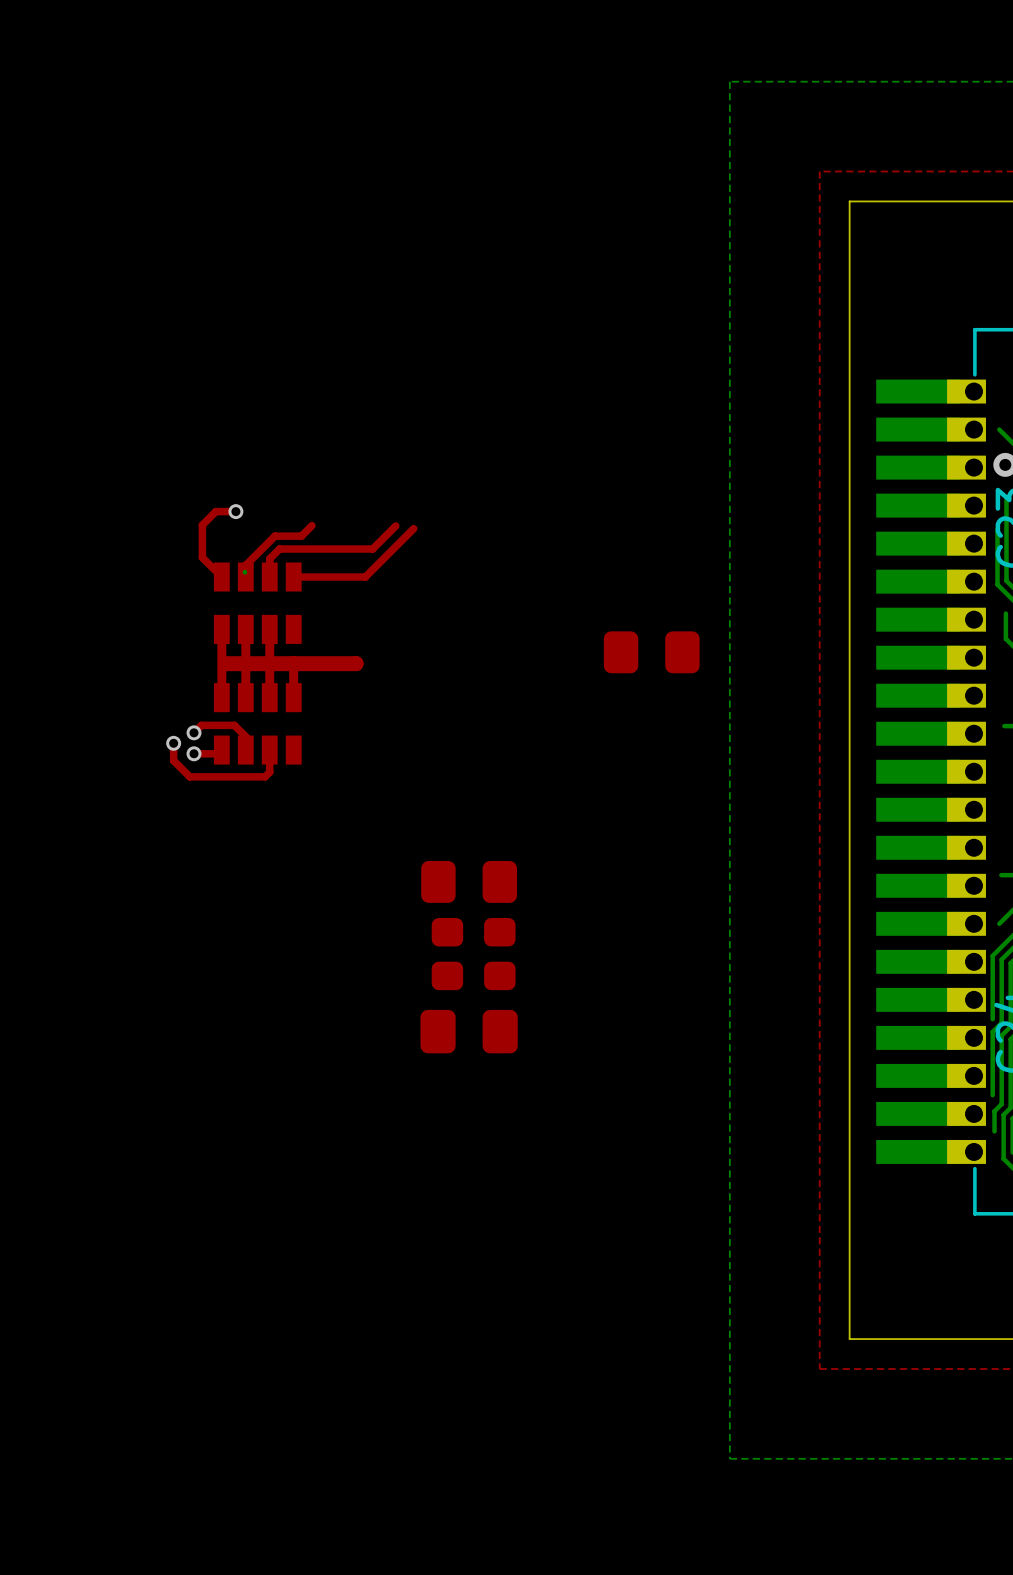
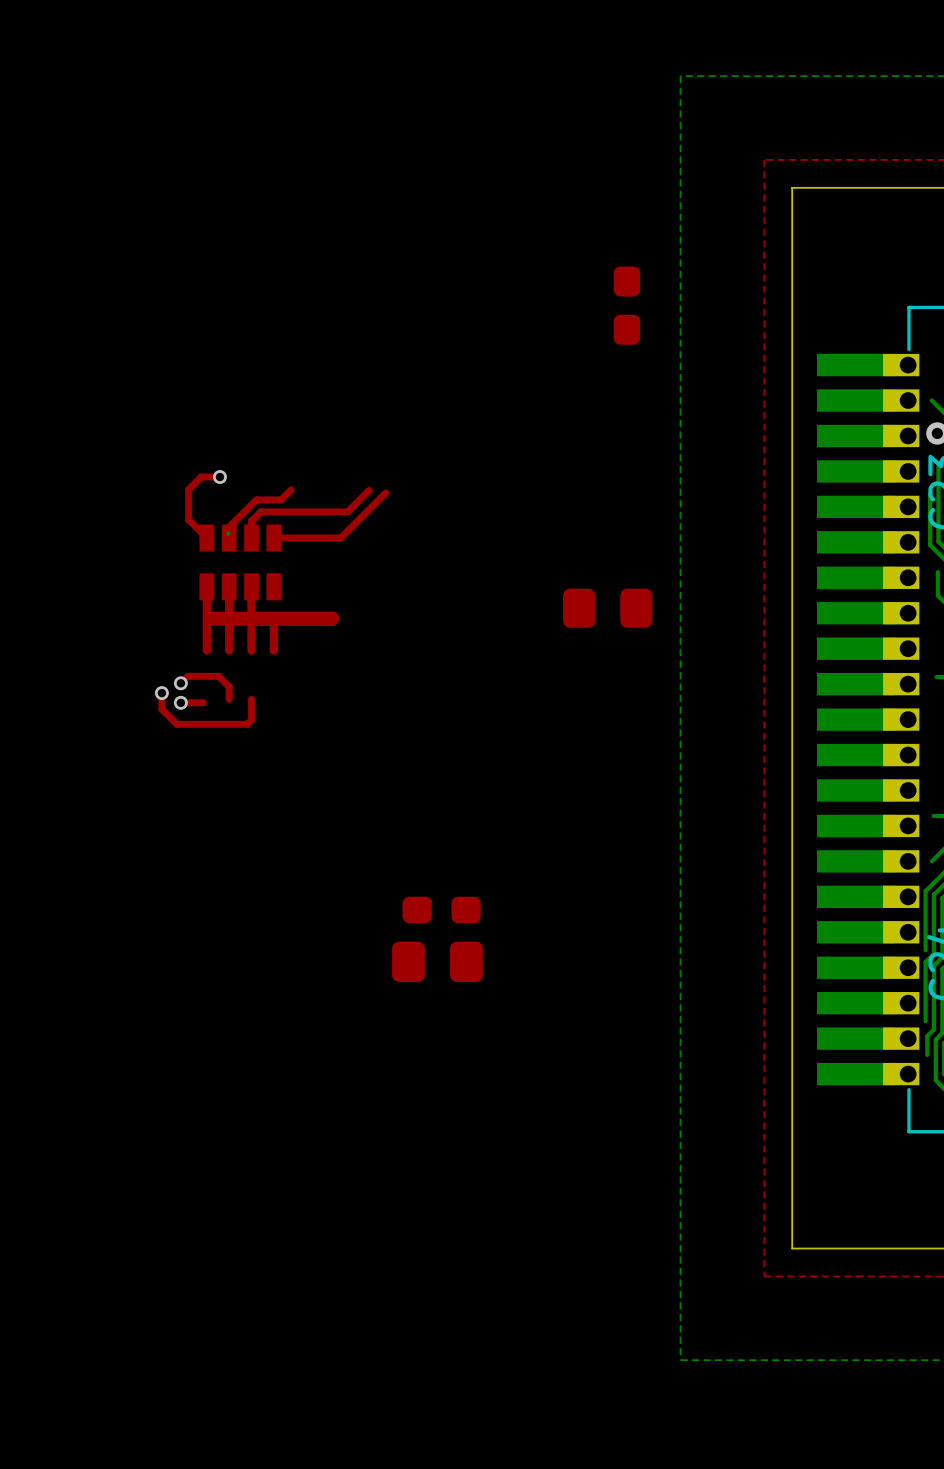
part: none -> (626, 305)
part: (257, 723) -> none
part: (469, 881) -> none
part: (473, 932) -> none

